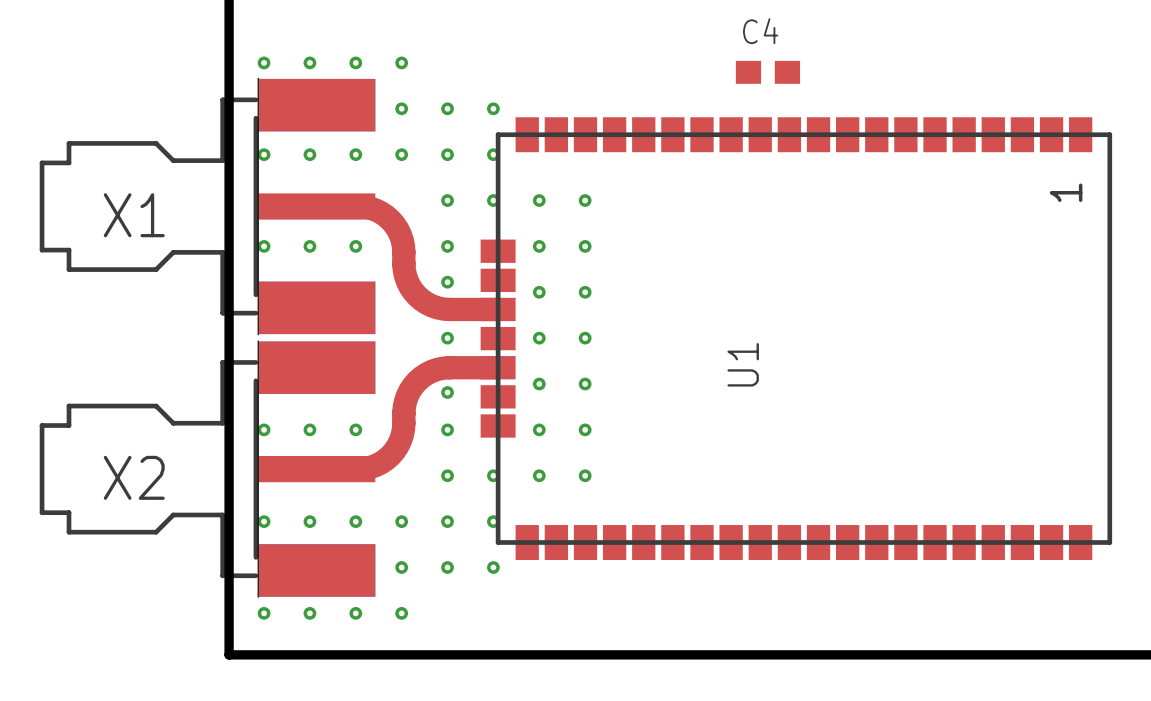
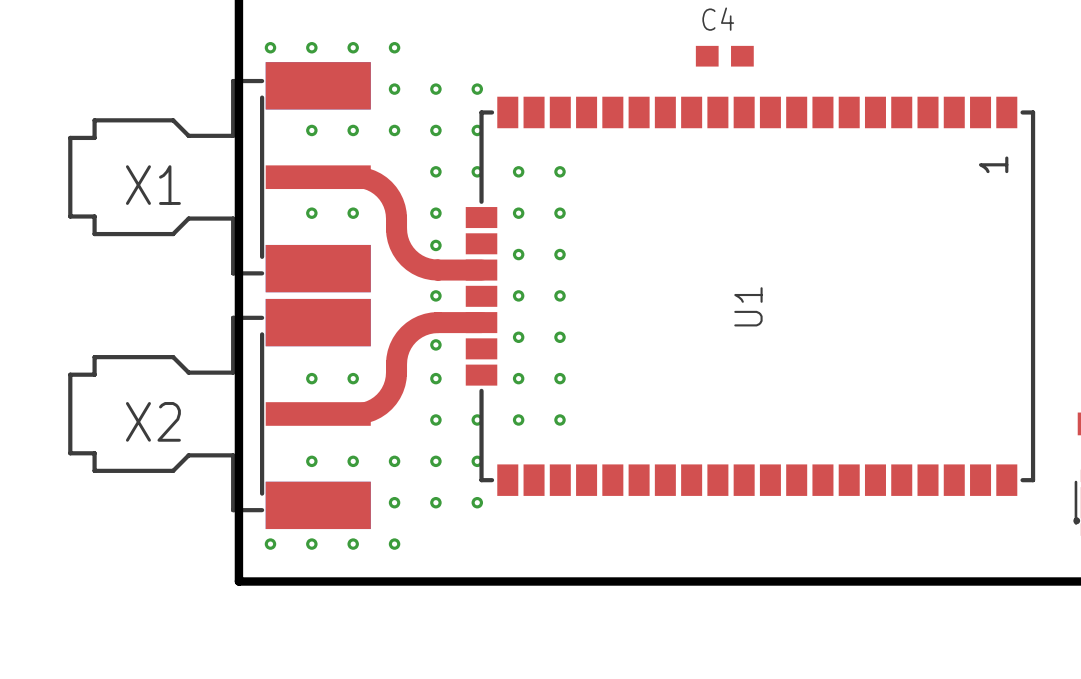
X1 footprint: [39, 78, 376, 335] -> [68, 62, 371, 293]
U1 footprint: [480, 117, 1113, 560] -> [465, 96, 1036, 496]
via: (264, 154) -> none
via: (264, 246) -> none
X2 footprint: [39, 340, 376, 598] -> [68, 298, 371, 530]
U1 name position: U1 (743, 364) -> U1 (748, 306)
via: (264, 429) -> none
via: (264, 521) -> none

